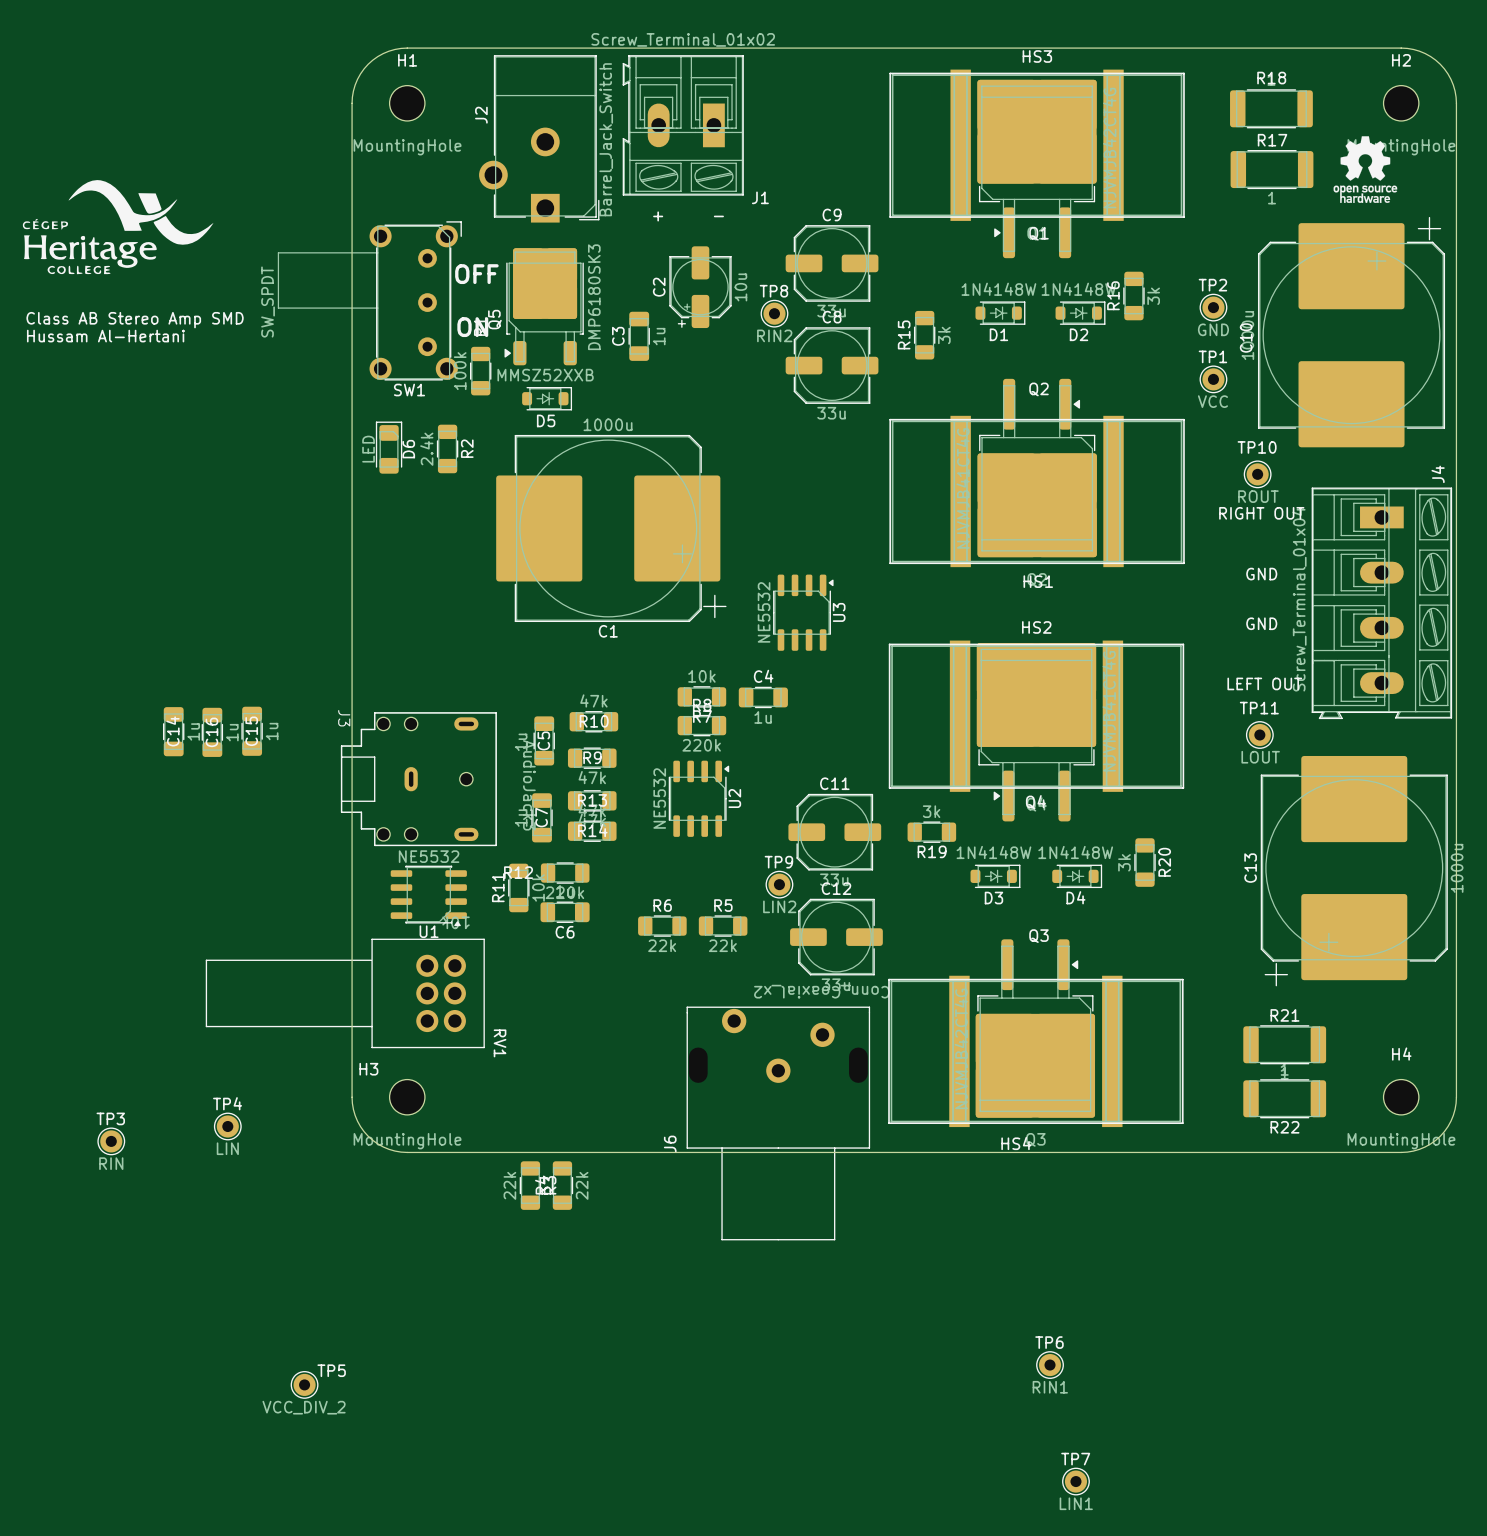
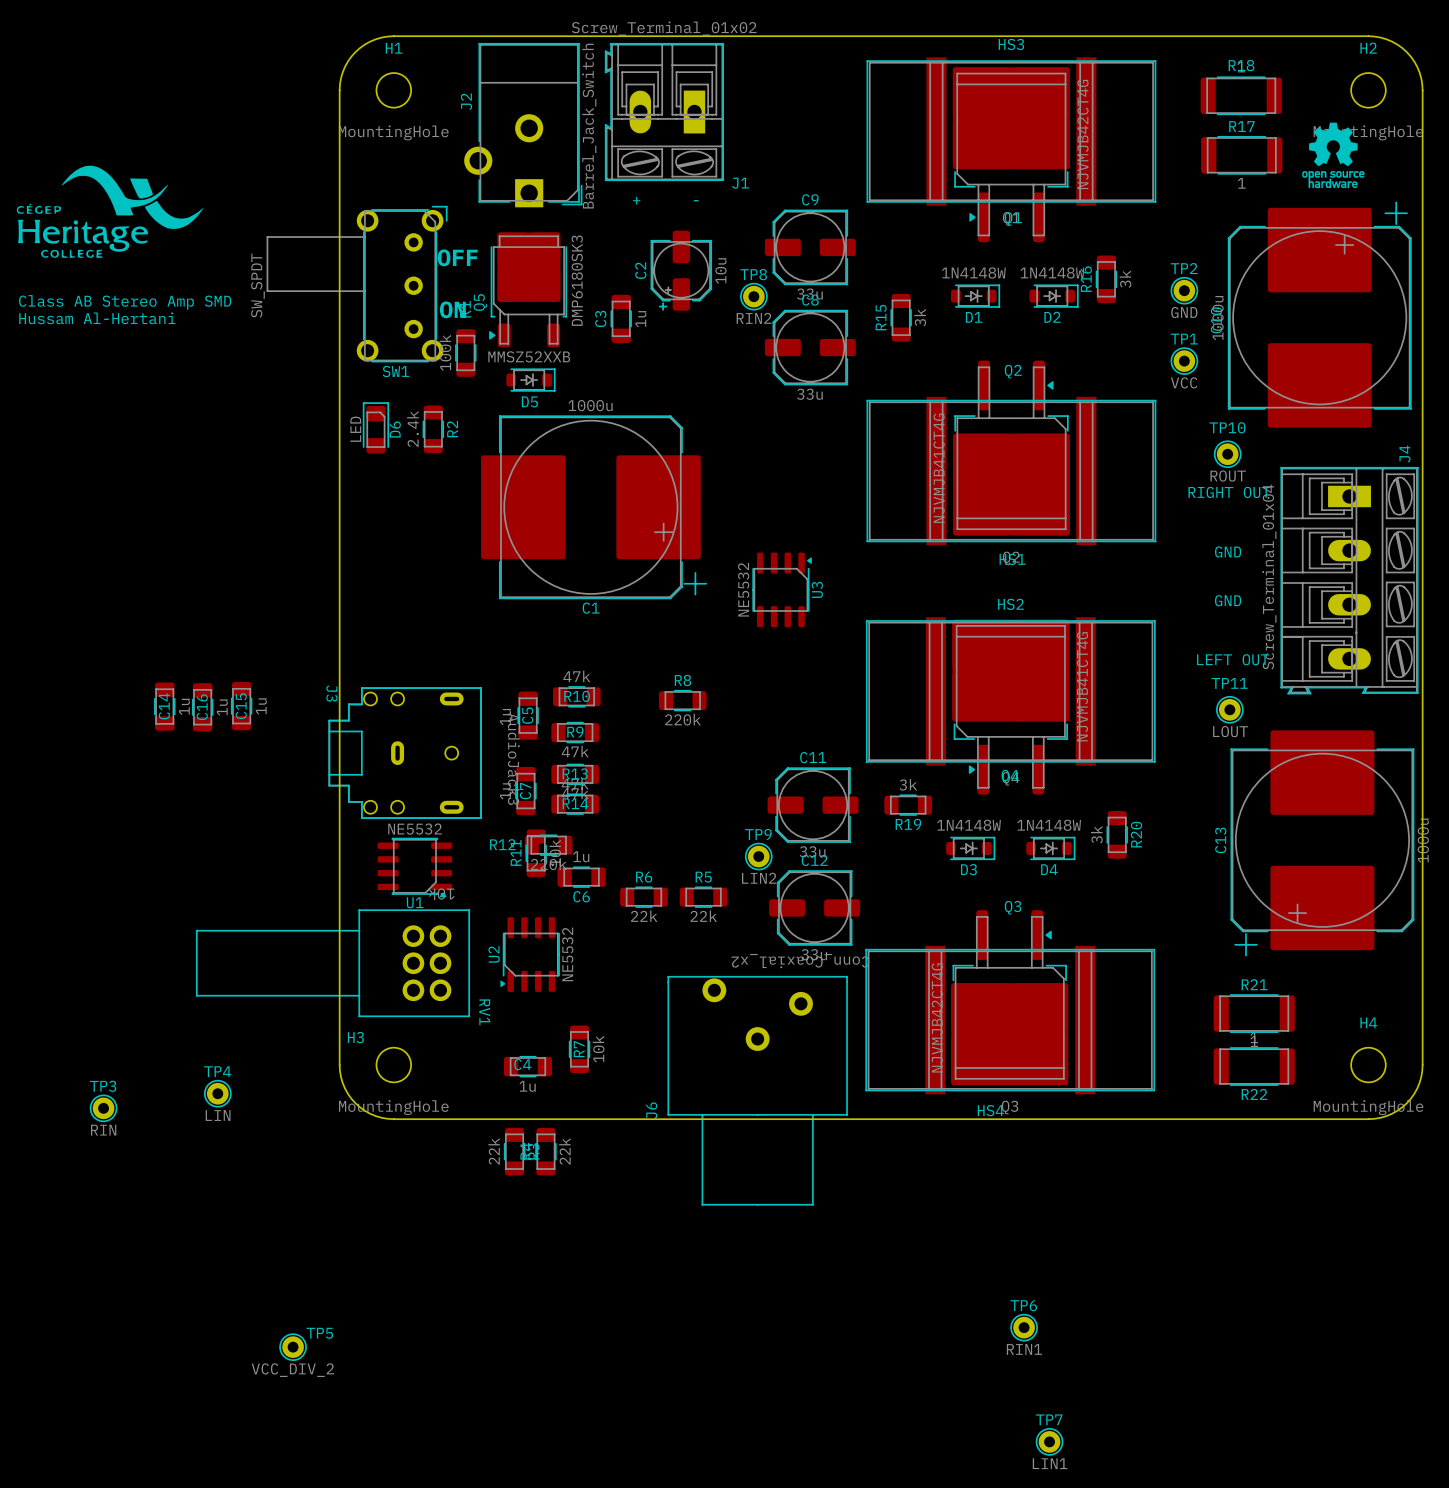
C4 name position: C4 (763, 676) -> C4 (522, 1064)
R7 rotation: 0° (701, 696) -> 90° clockwise (579, 1049)
R7 position: (701, 696) -> (579, 1049)
C4 position: (763, 697) -> (527, 1066)
U2 rotation: 0° (698, 798) -> 180° (530, 954)
U2 position: (698, 798) -> (530, 954)
R11 position: (518, 887) -> (536, 853)
C6 position: (565, 912) -> (581, 877)

